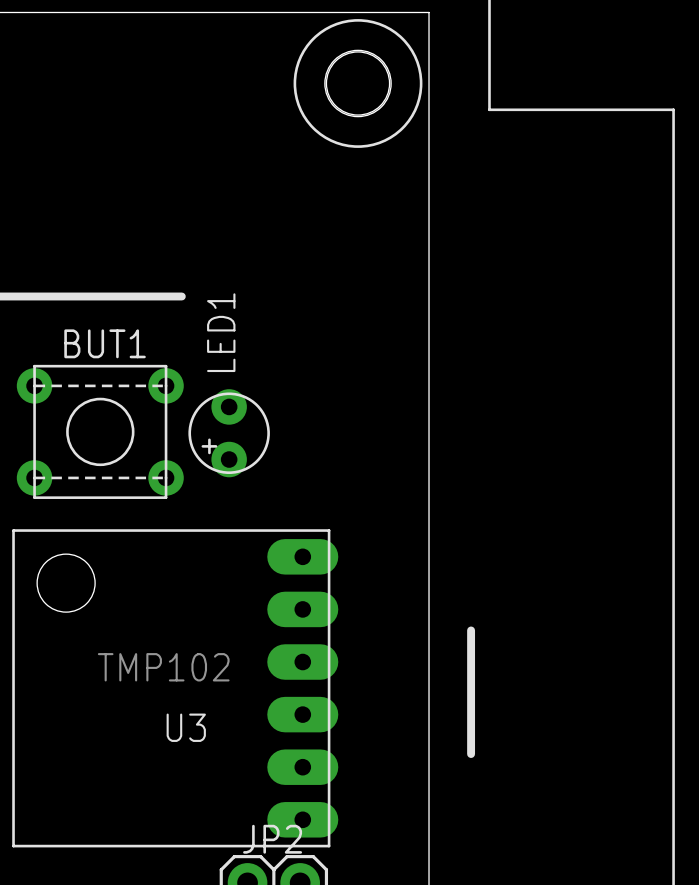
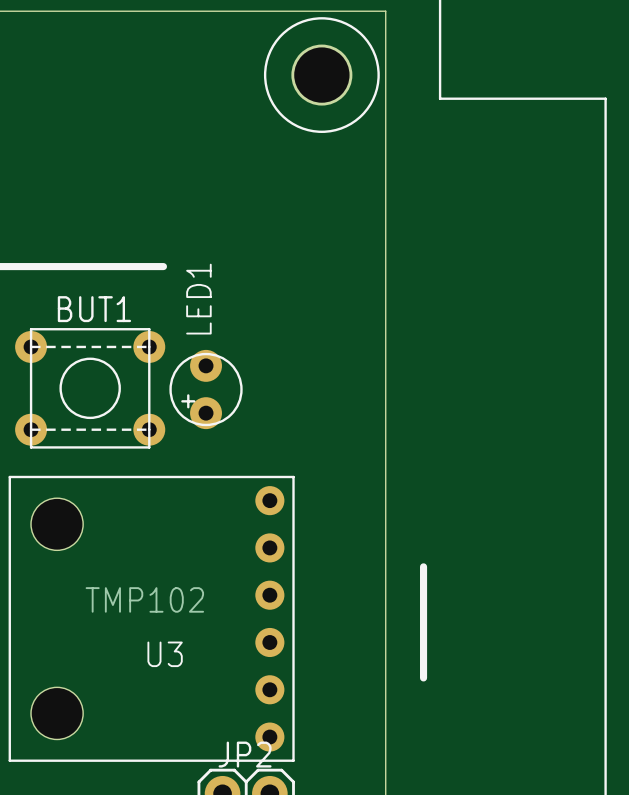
U3 footprint: [12, 529, 339, 848] -> [8, 475, 295, 762]

